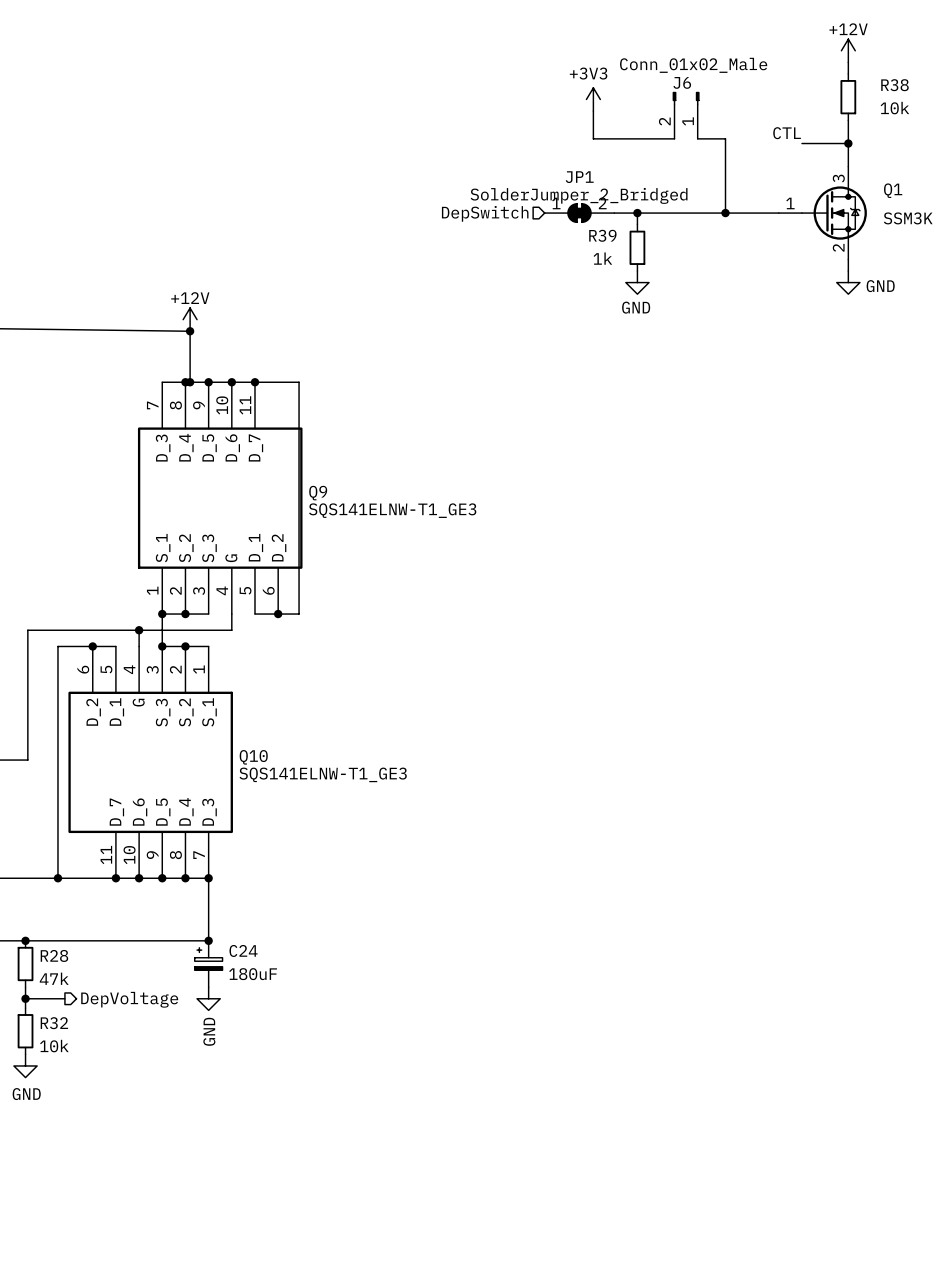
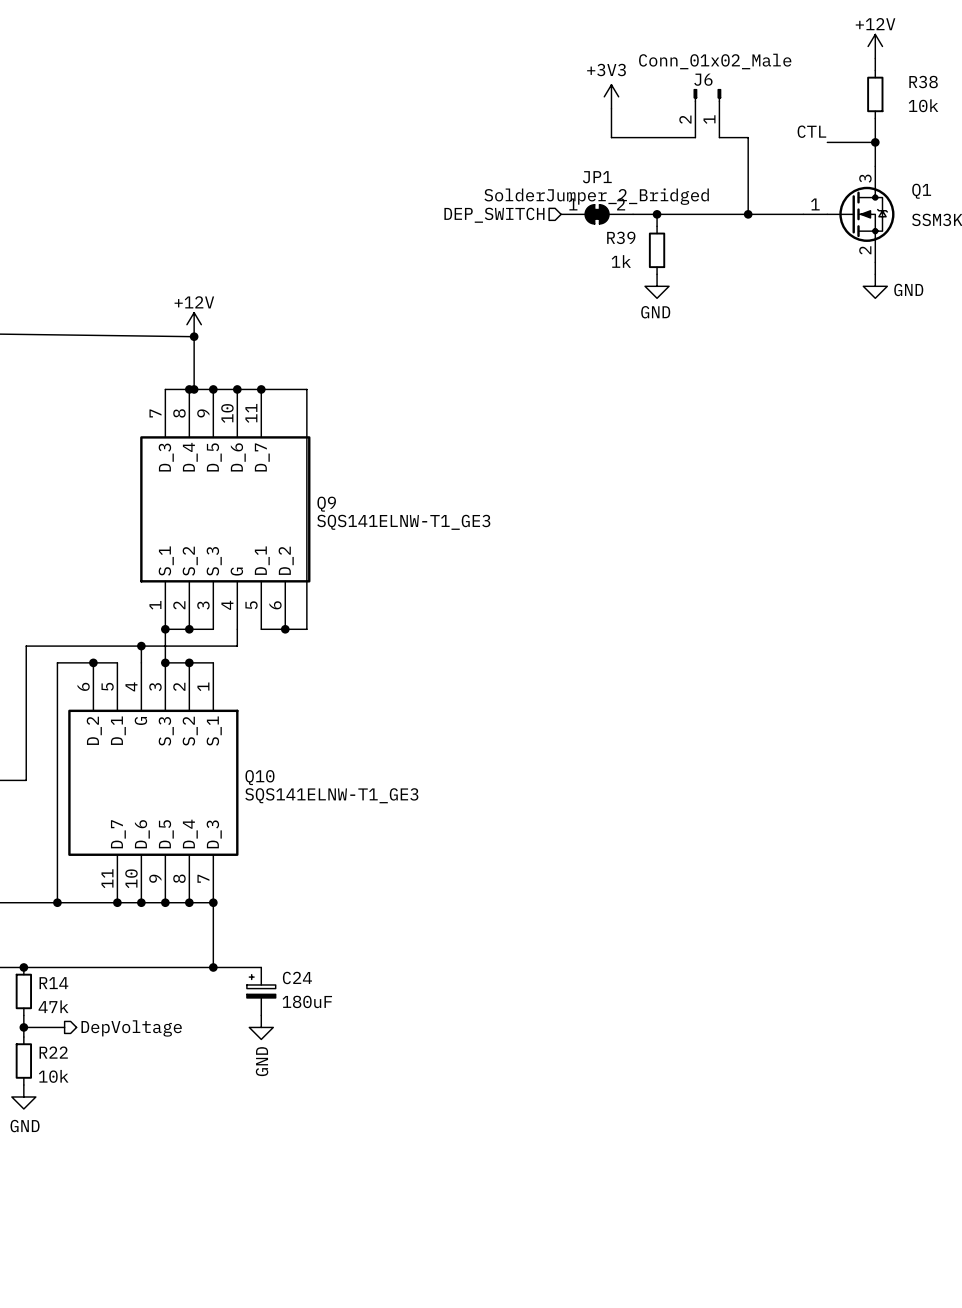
hierarchical label: DepSwitch (485, 213) -> DEP_SWITCH (494, 215)
wire: none -> (213, 967) (261, 967)
R28 name: R28 (54, 955) -> R14 (53, 983)
C24 position: (208, 964) -> (261, 991)
power symbol position: GND (208, 998) -> GND (261, 1027)
R32 name: R32 (54, 1023) -> R22 (53, 1052)

